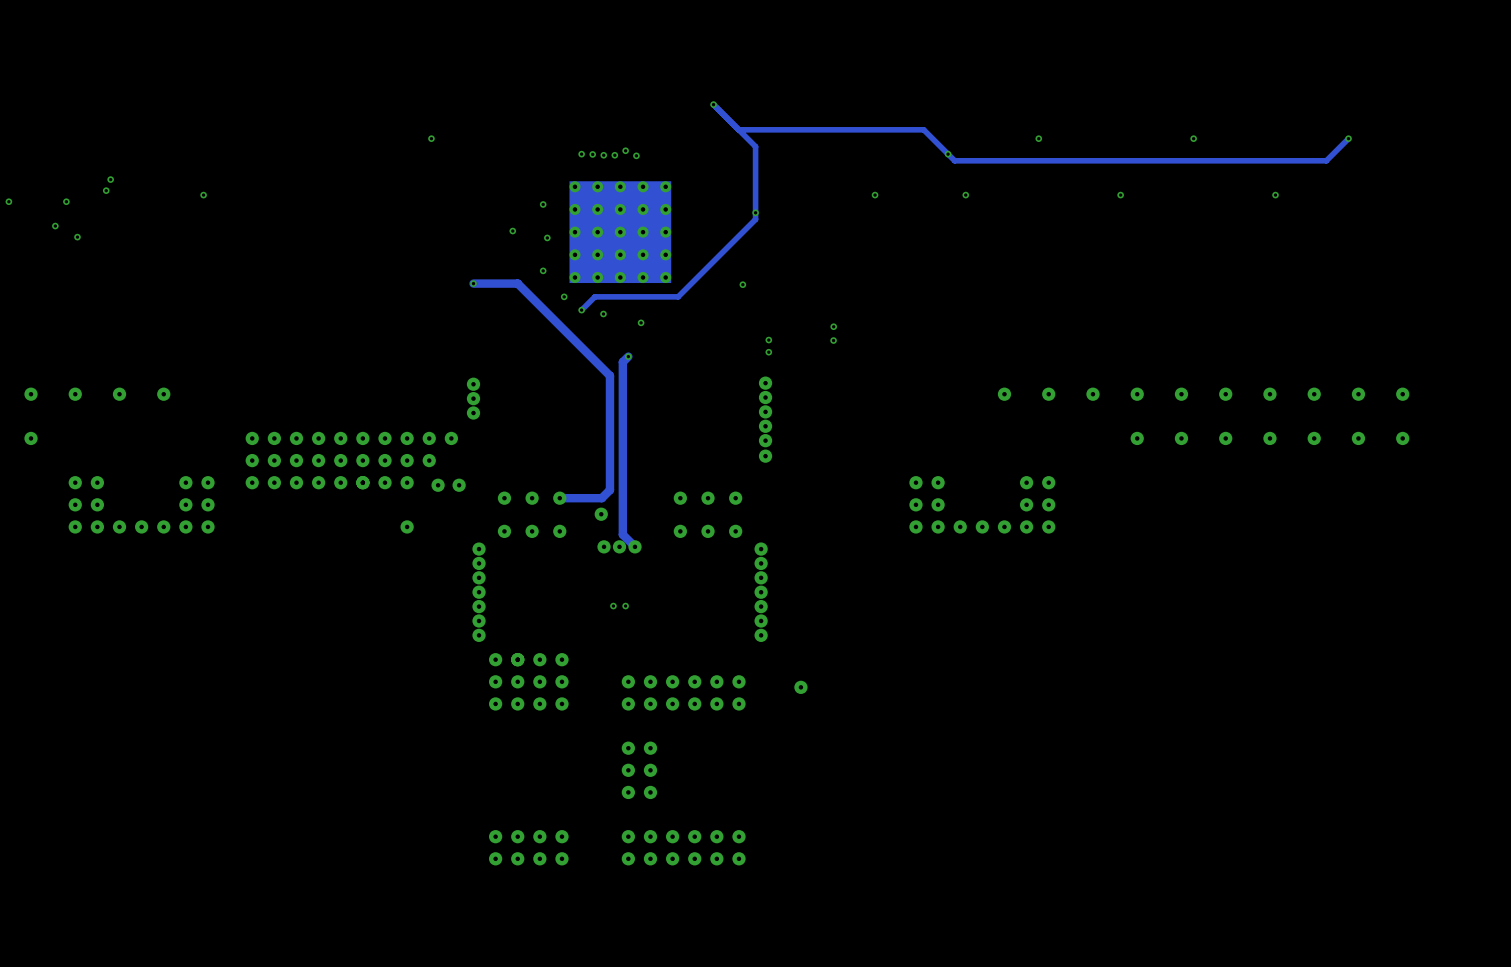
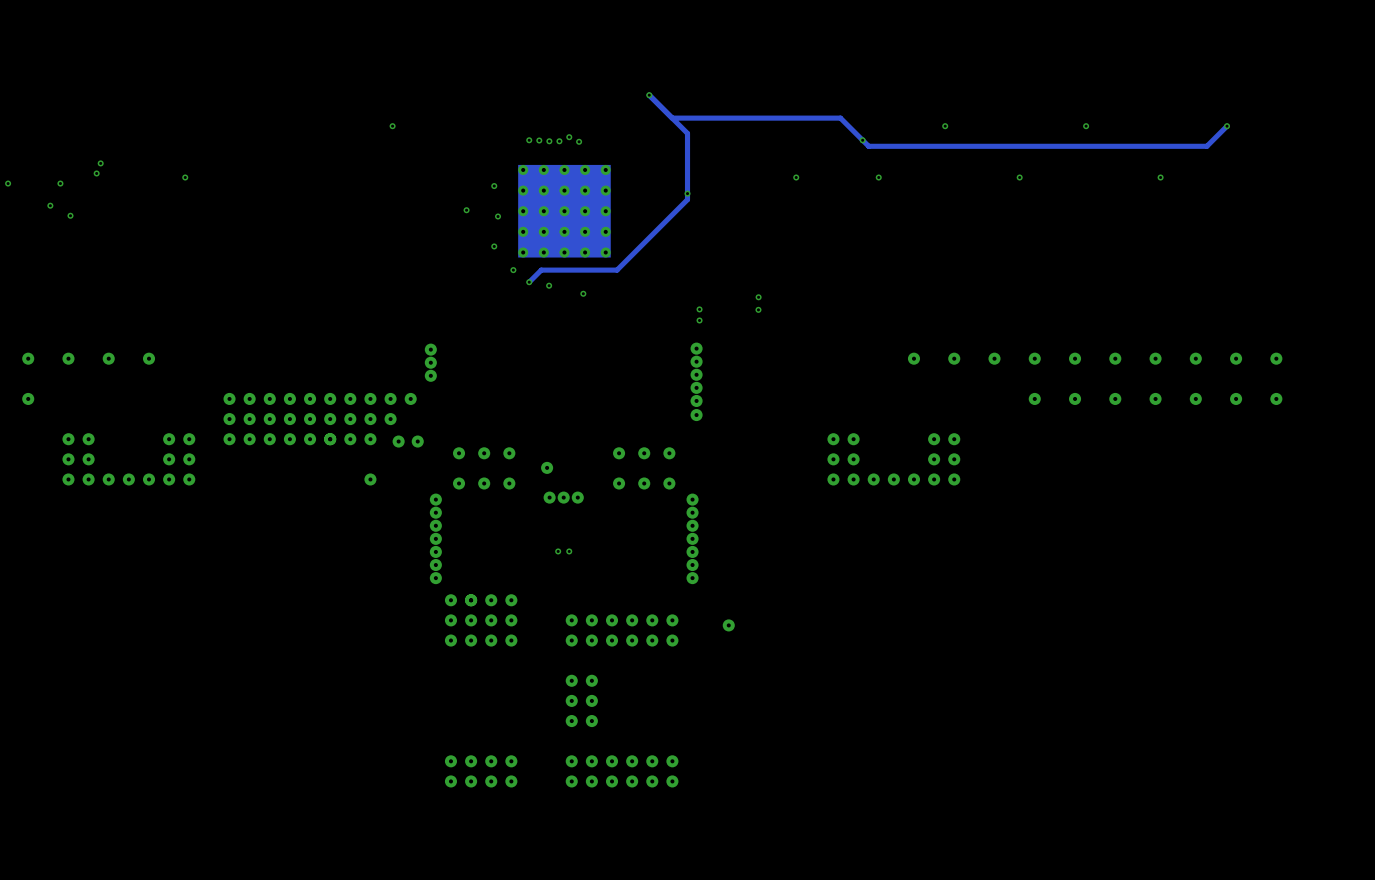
track: (473, 283) (517, 283) (609, 375) (609, 490) (601, 498) (559, 498) -> none
via: (473, 283) -> none
via: (742, 284) -> none
track: (628, 356) (622, 362) (622, 534) (635, 546) -> none
via: (628, 356) -> none

